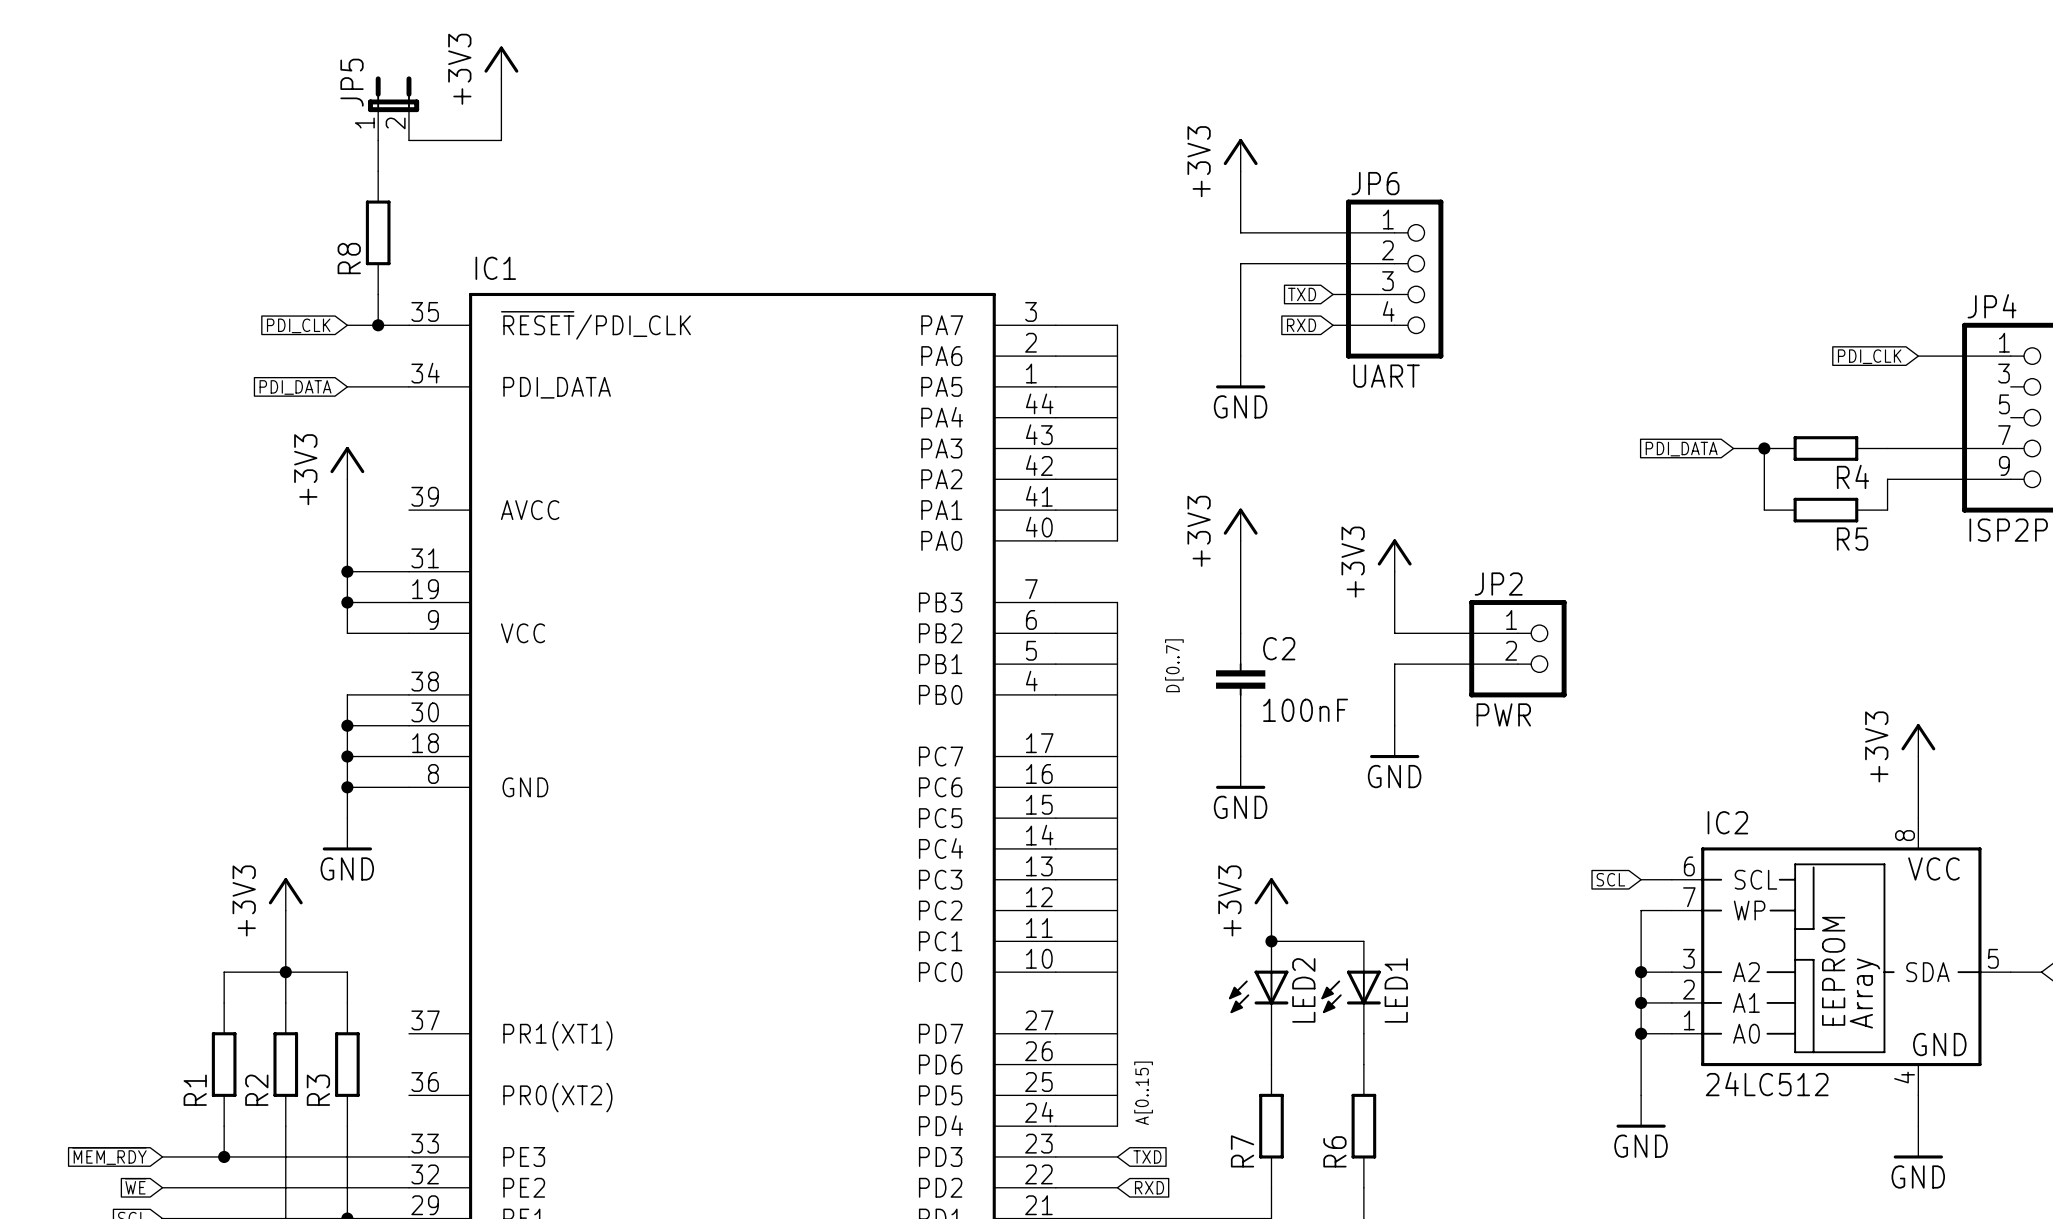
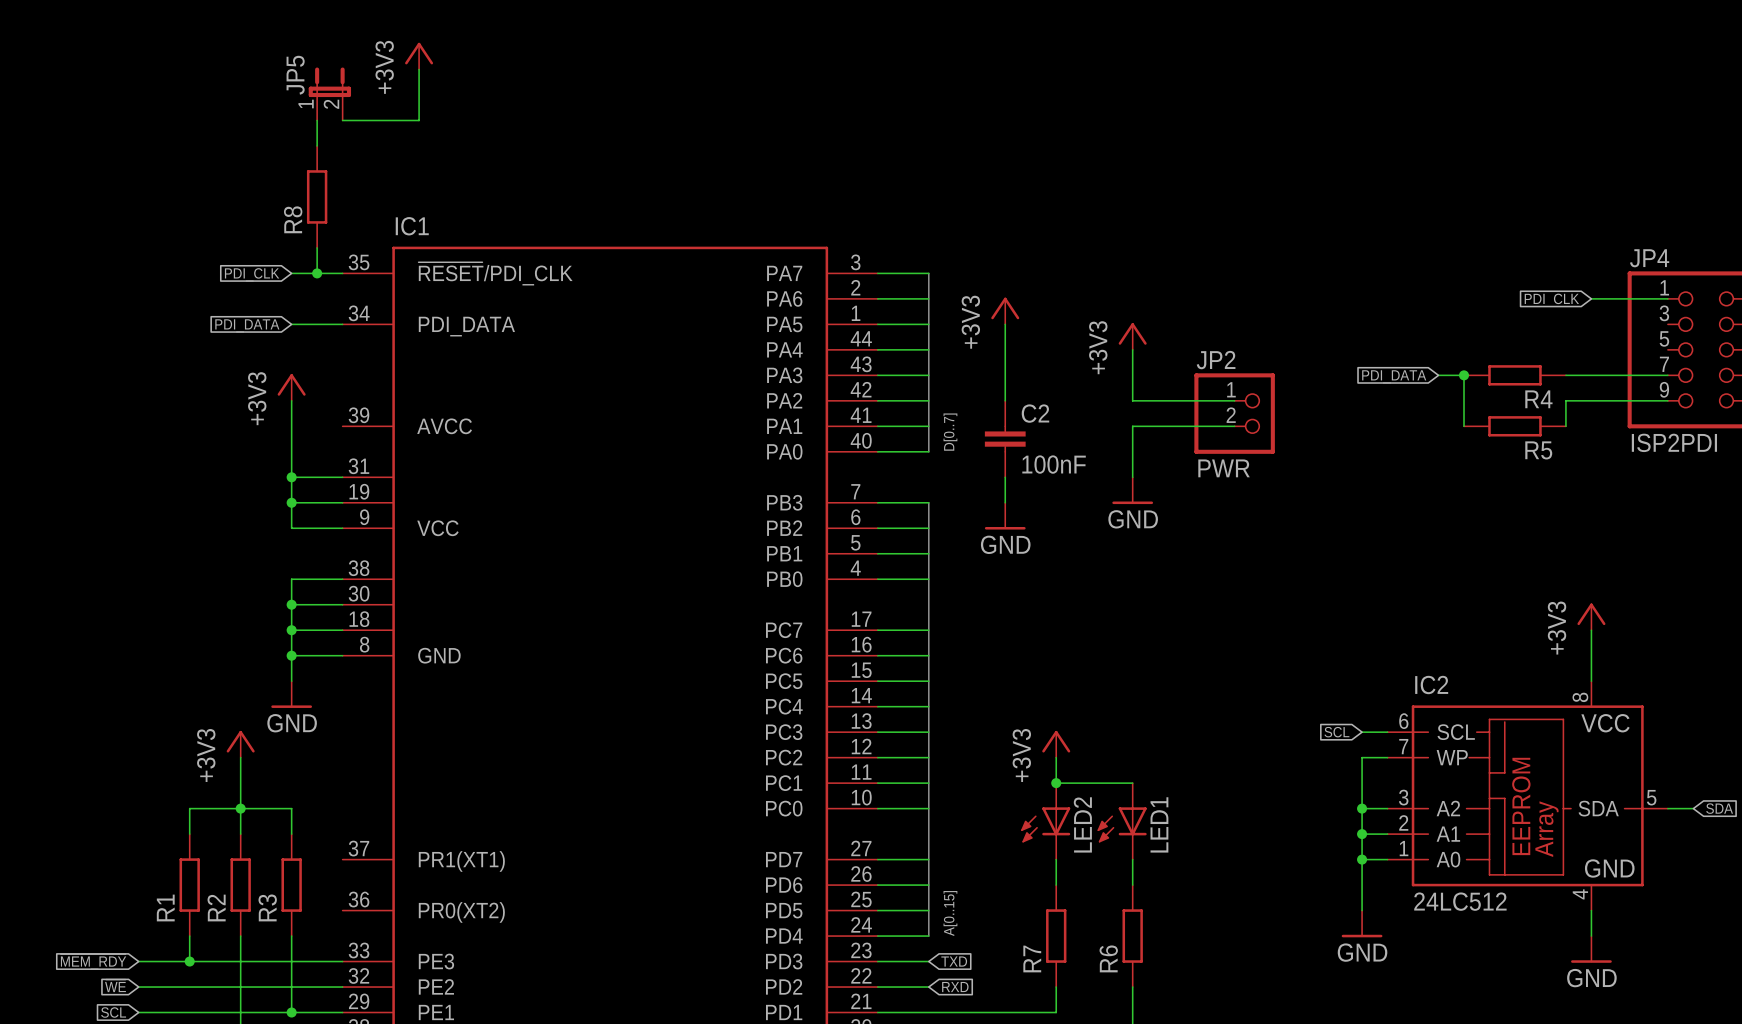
power symbol: +3V3 (1240, 155) -> none
wire: (1240, 171) (1240, 232) (1394, 232) -> none
wire: (1394, 263) (1240, 263) (1240, 356) -> none
JP6: UART (1394, 279) -> none
global label: TXD (1302, 294) -> none
wire: (1333, 294) (1394, 294) -> none
global label: RXD (1301, 325) -> none
wire: (1333, 325) (1394, 325) -> none
power symbol: none -> +3V3 (1005, 311)
power symbol: GND (1240, 372) -> none
power symbol: none -> +3V3 (1132, 336)
power symbol: +3V3 (1240, 524) -> none
wire: (1240, 540) (1240, 633) -> (1005, 324) (1005, 400)
power symbol: +3V3 (1394, 555) -> none
wire: (1394, 571) (1394, 633) (1517, 633) -> (1132, 349) (1132, 400) (1234, 400)
power symbol: none -> GND (1132, 490)
power symbol: none -> GND (1005, 516)
JP2 position: (1517, 648) -> (1234, 413)
wire: (1517, 664) (1394, 664) (1394, 725) -> (1234, 426) (1132, 426) (1132, 477)
label position: D[0..7] (1174, 665) -> D[0..7] (950, 432)
C2 position: (1240, 679) -> (1005, 439)
wire: (1240, 725) (1240, 756) -> (1005, 477) (1005, 502)
power symbol: GND (1394, 741) -> none
power symbol: GND (1240, 772) -> none

